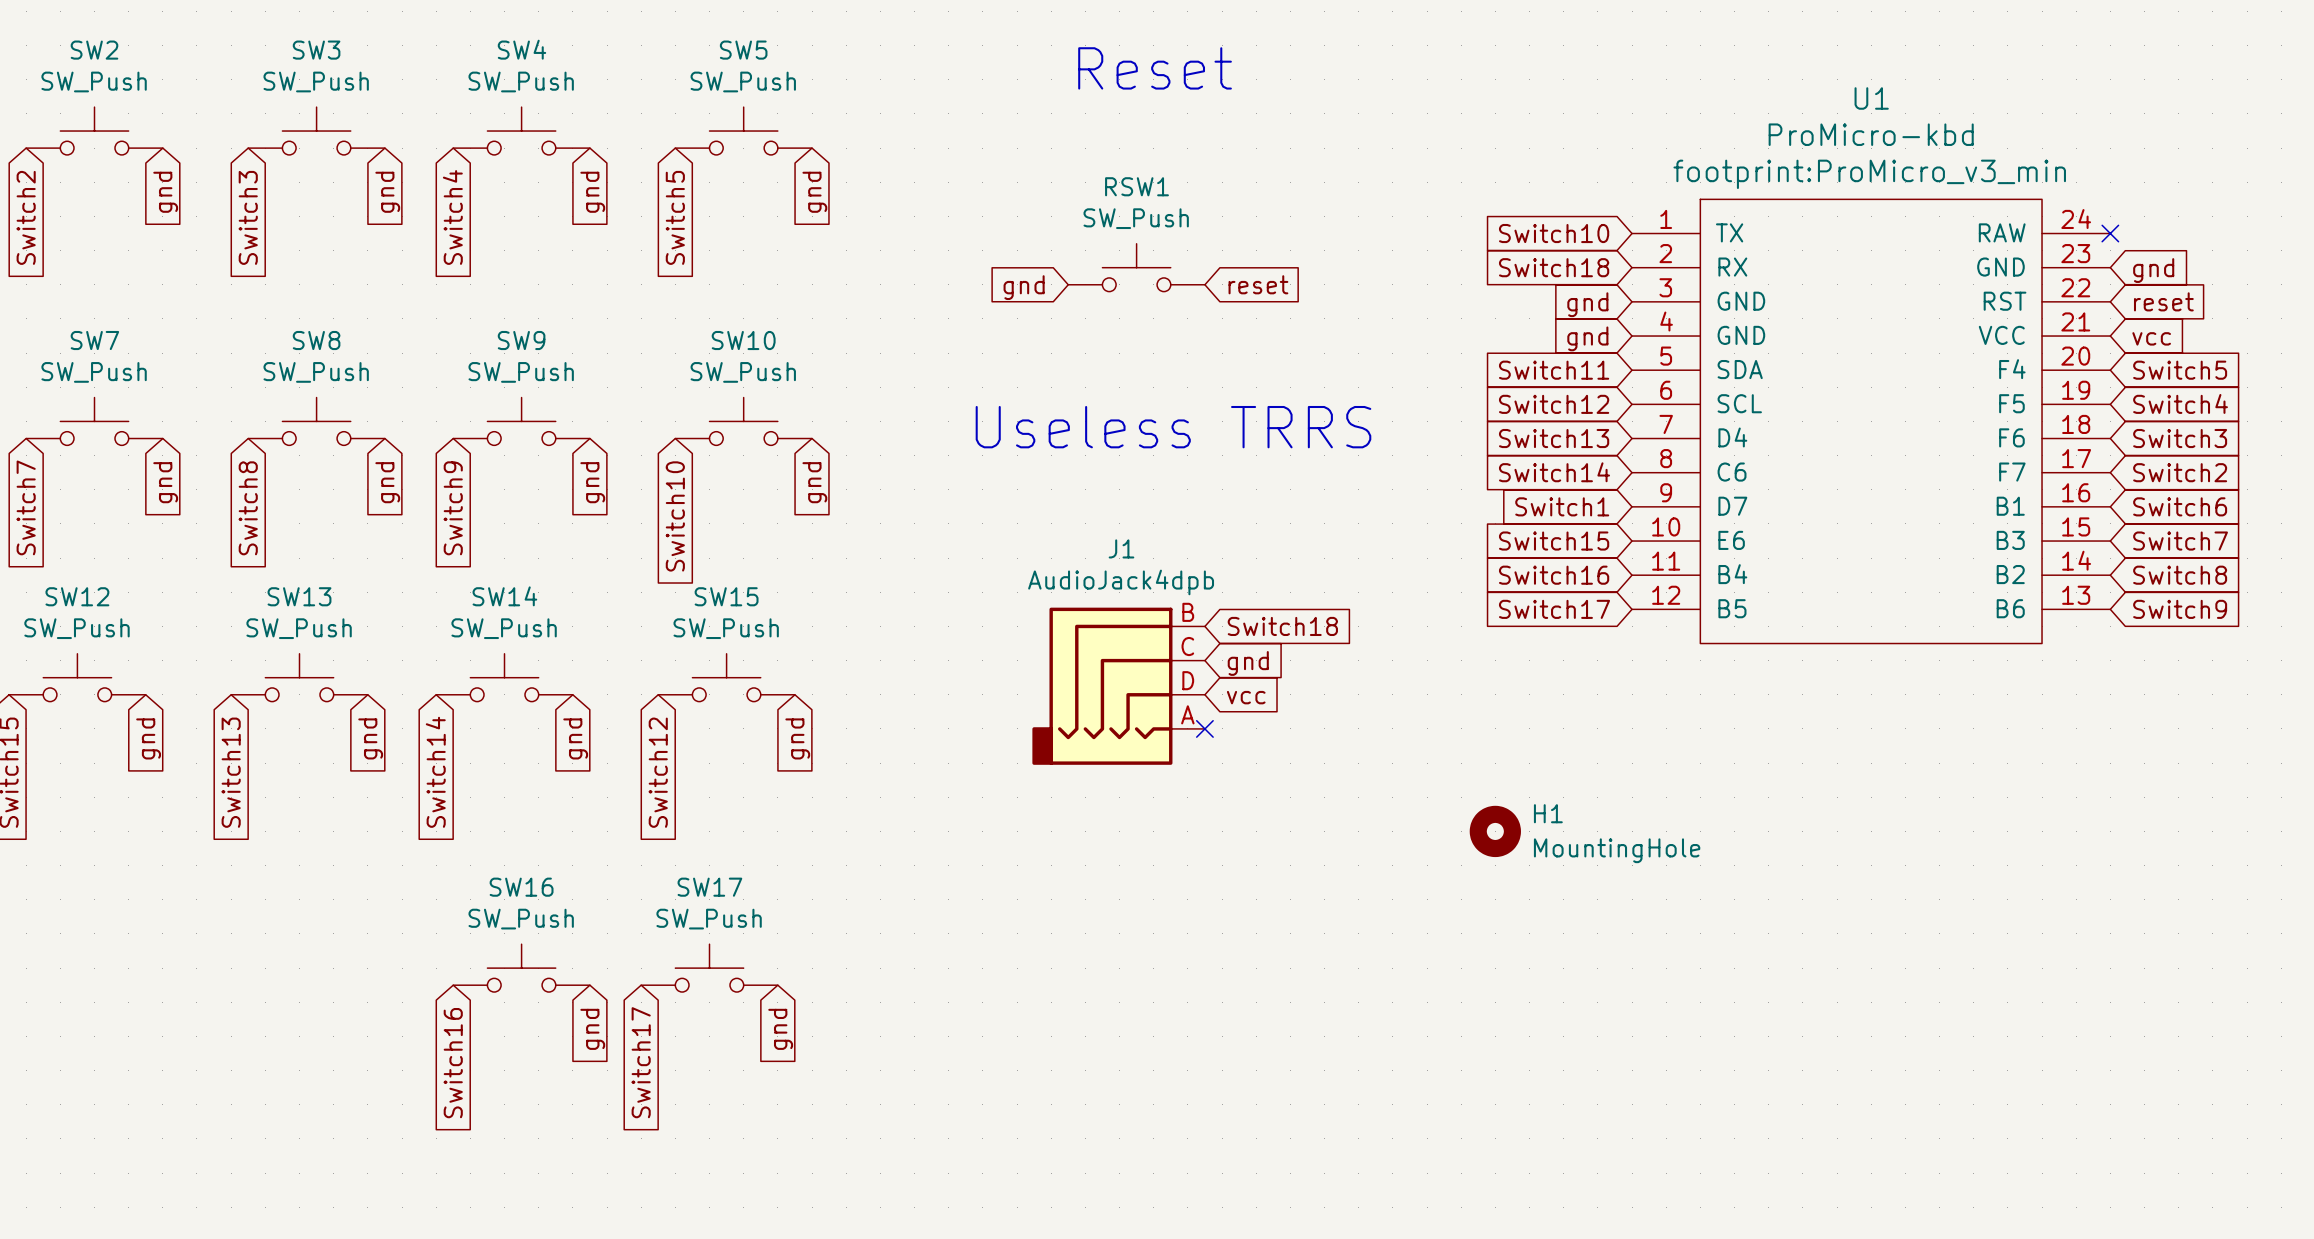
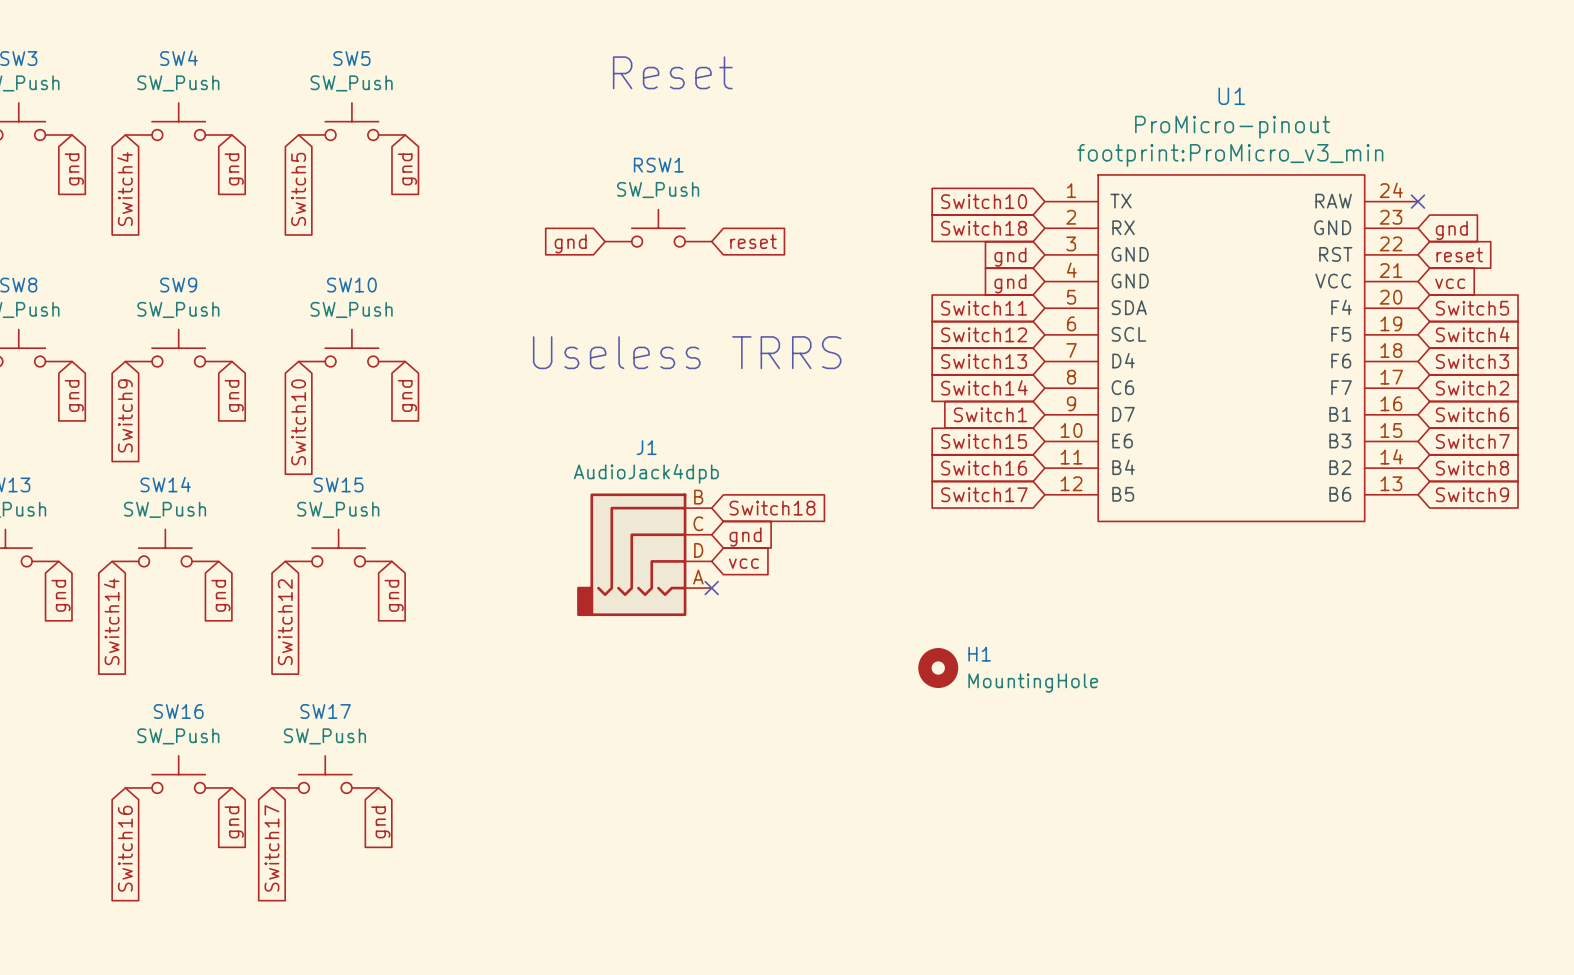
U1 value: ProMicro-kbd (1871, 134) -> ProMicro-pinout (1232, 127)

